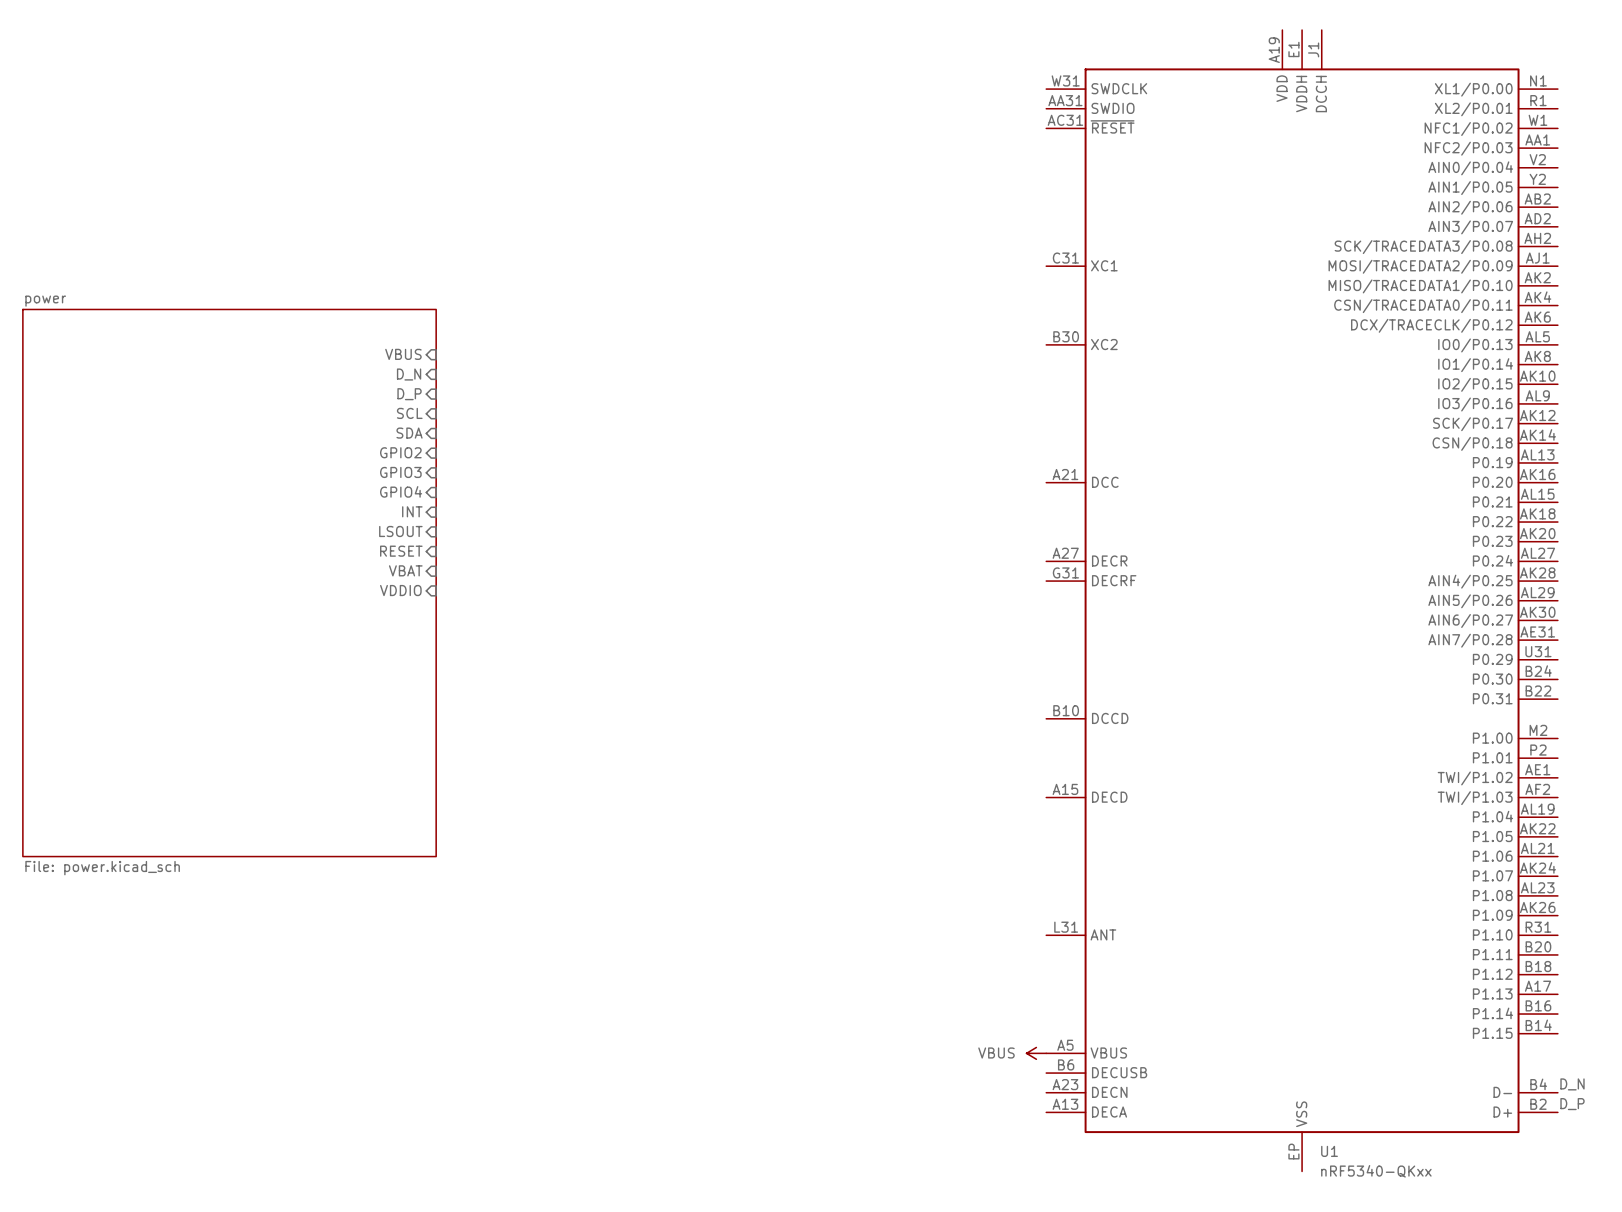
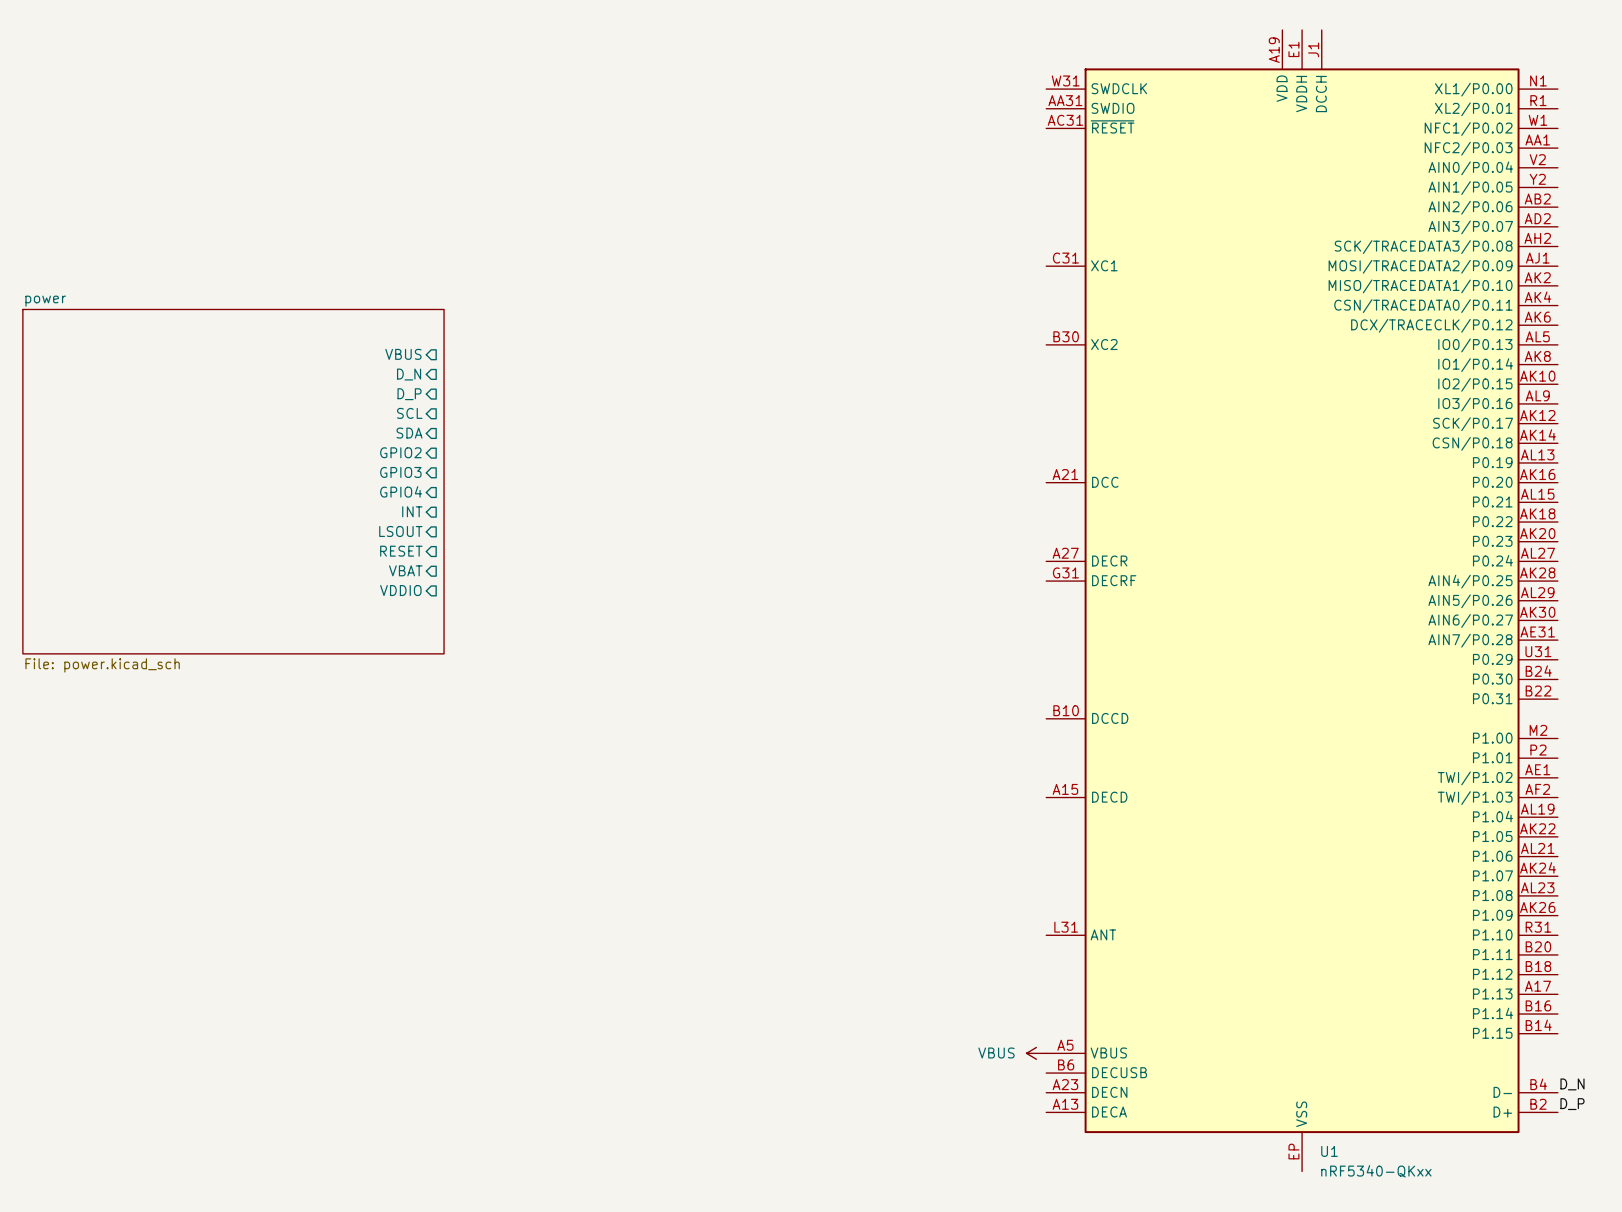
sheet power: none -> File: power.kicad_sch (233, 481)
sheet power: File: power.kicad_sch (229, 583) -> none

